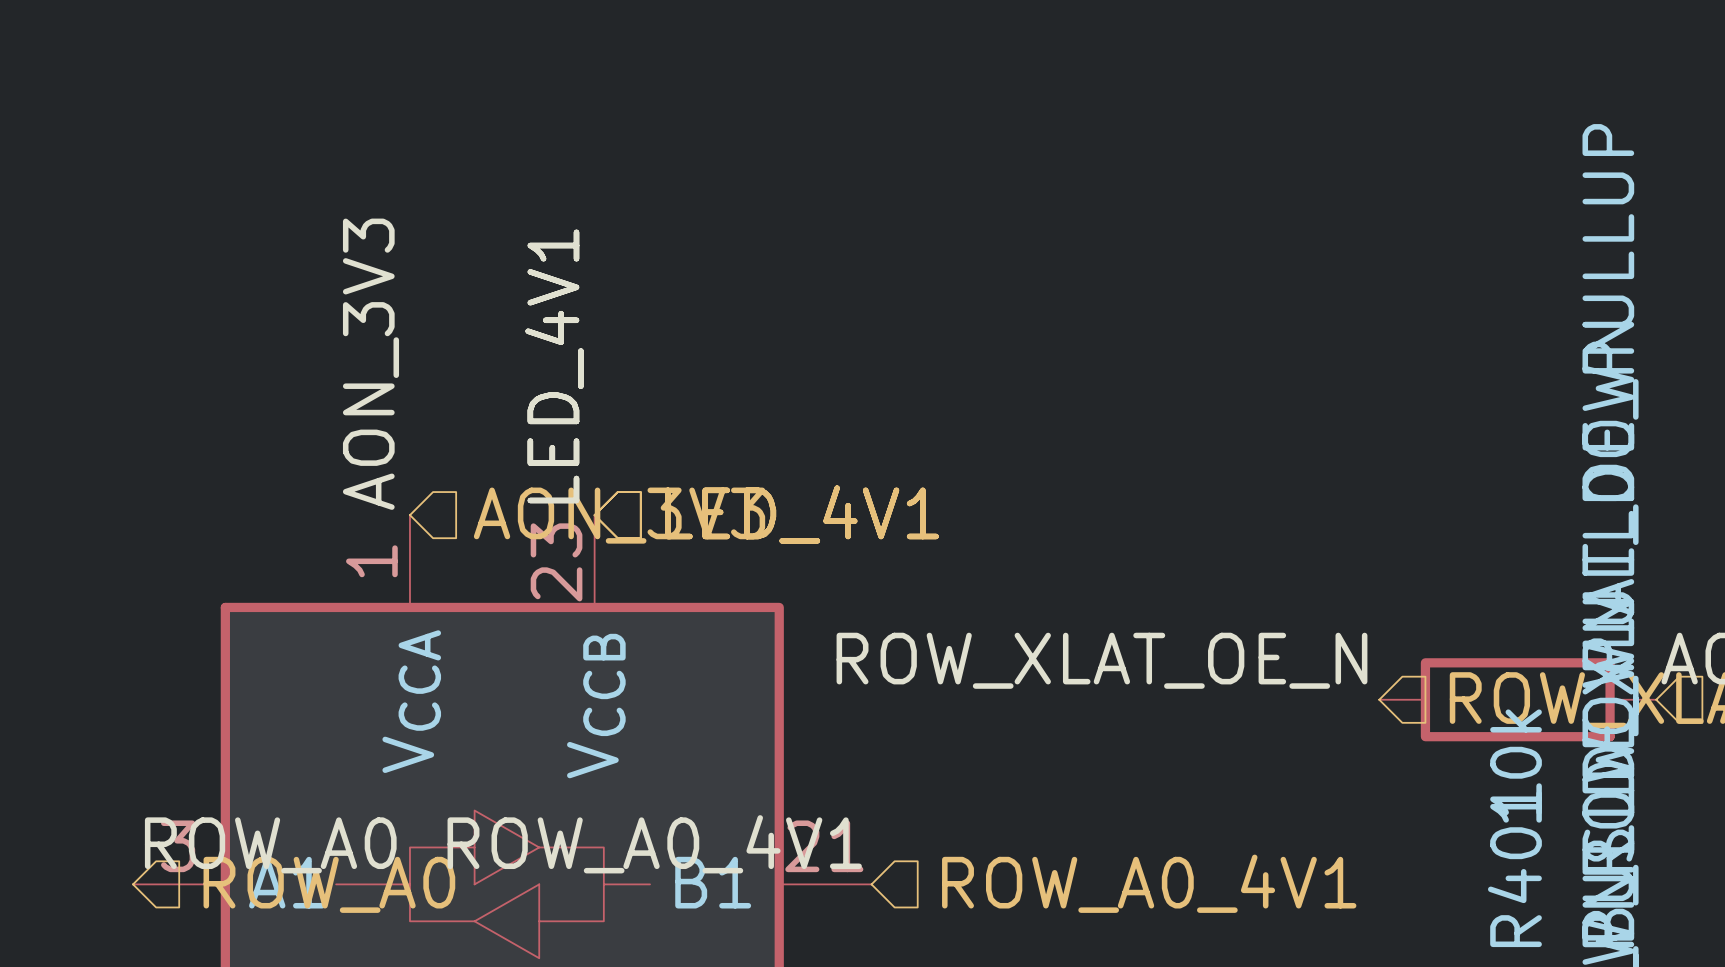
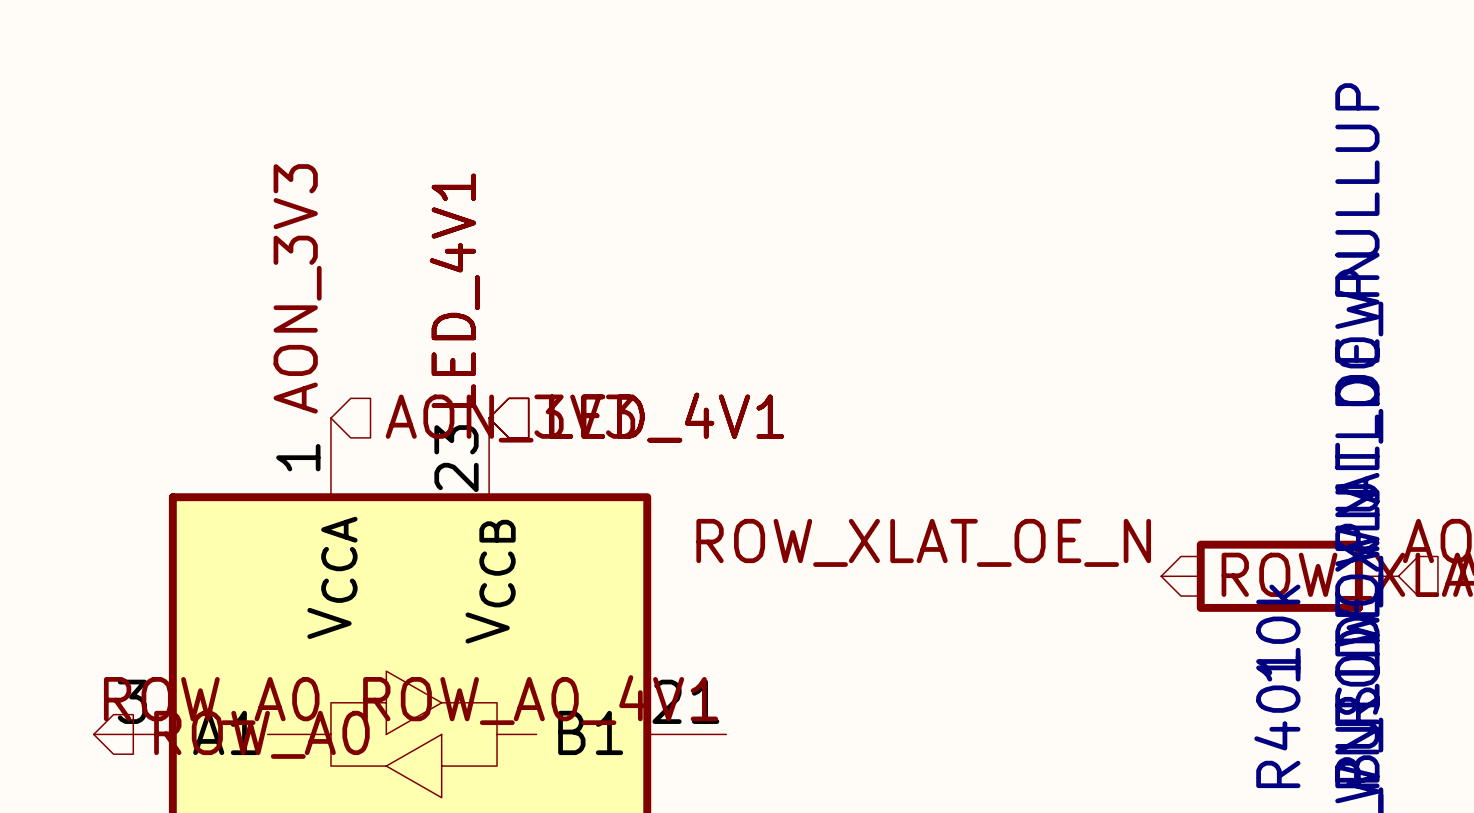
hierarchical label: ROW_A0_4V1 (1149, 883) -> none

